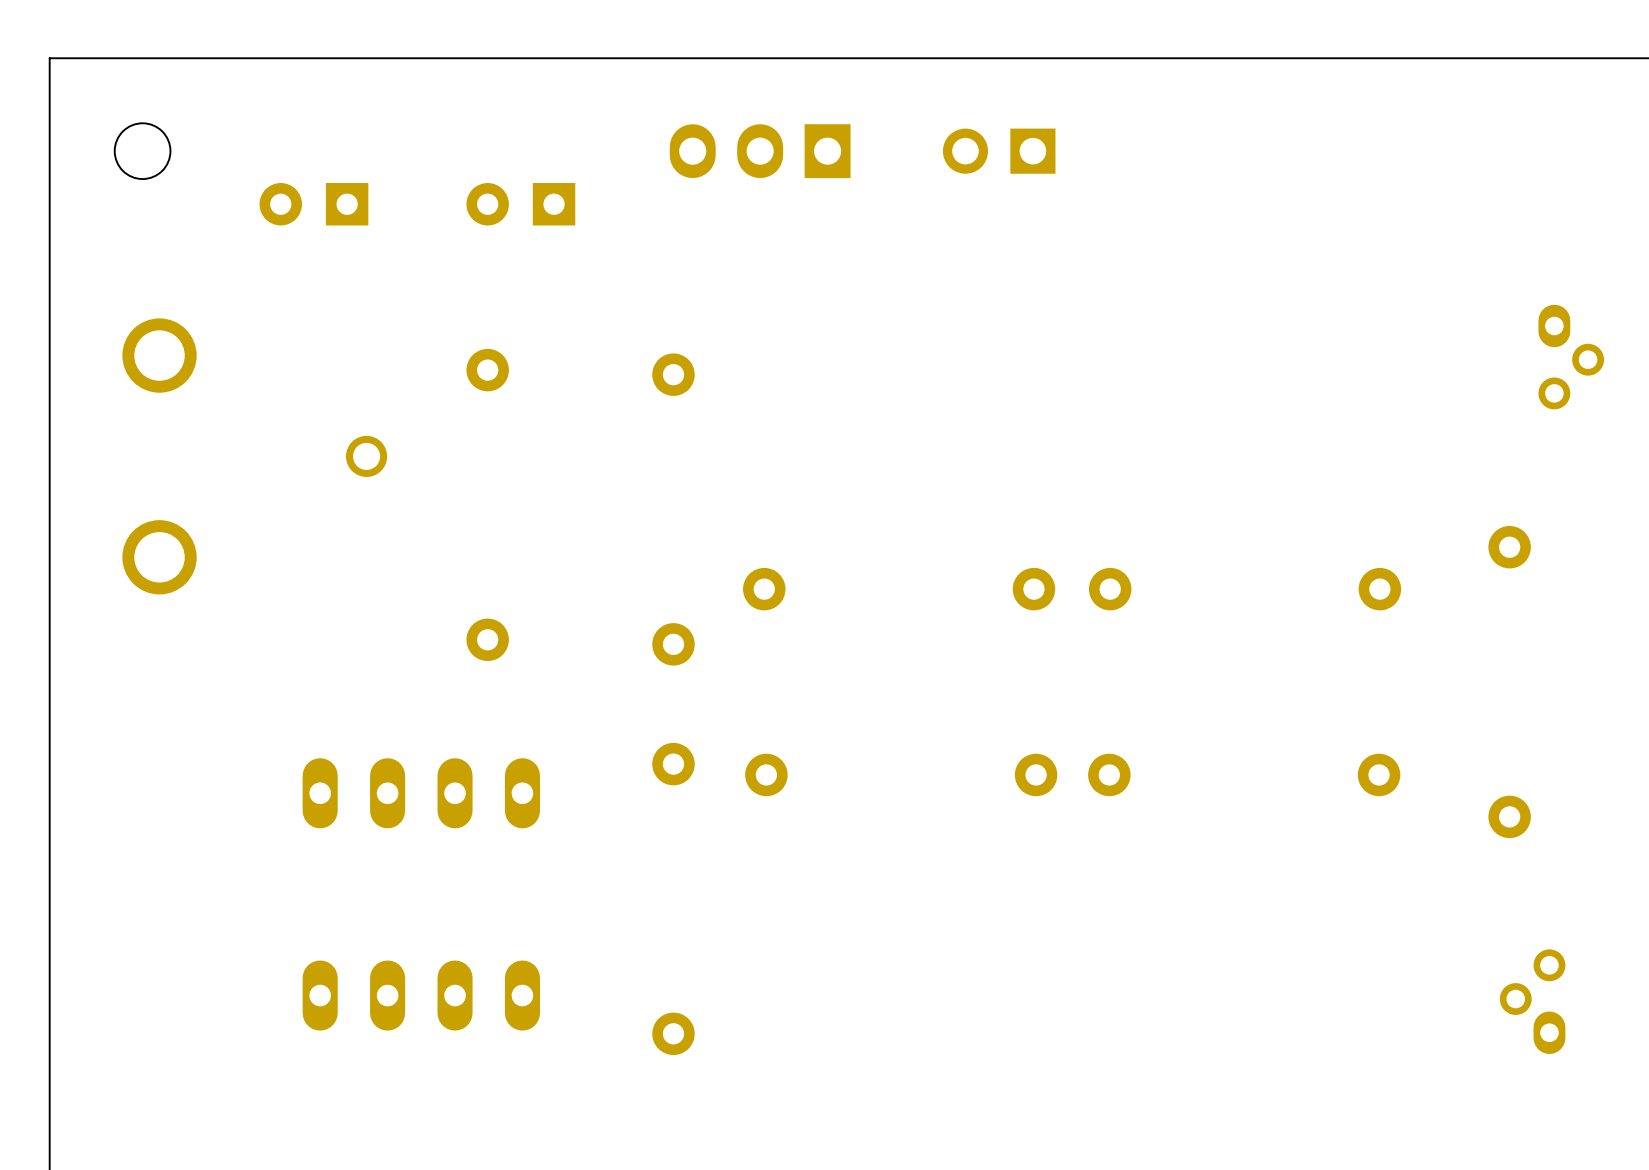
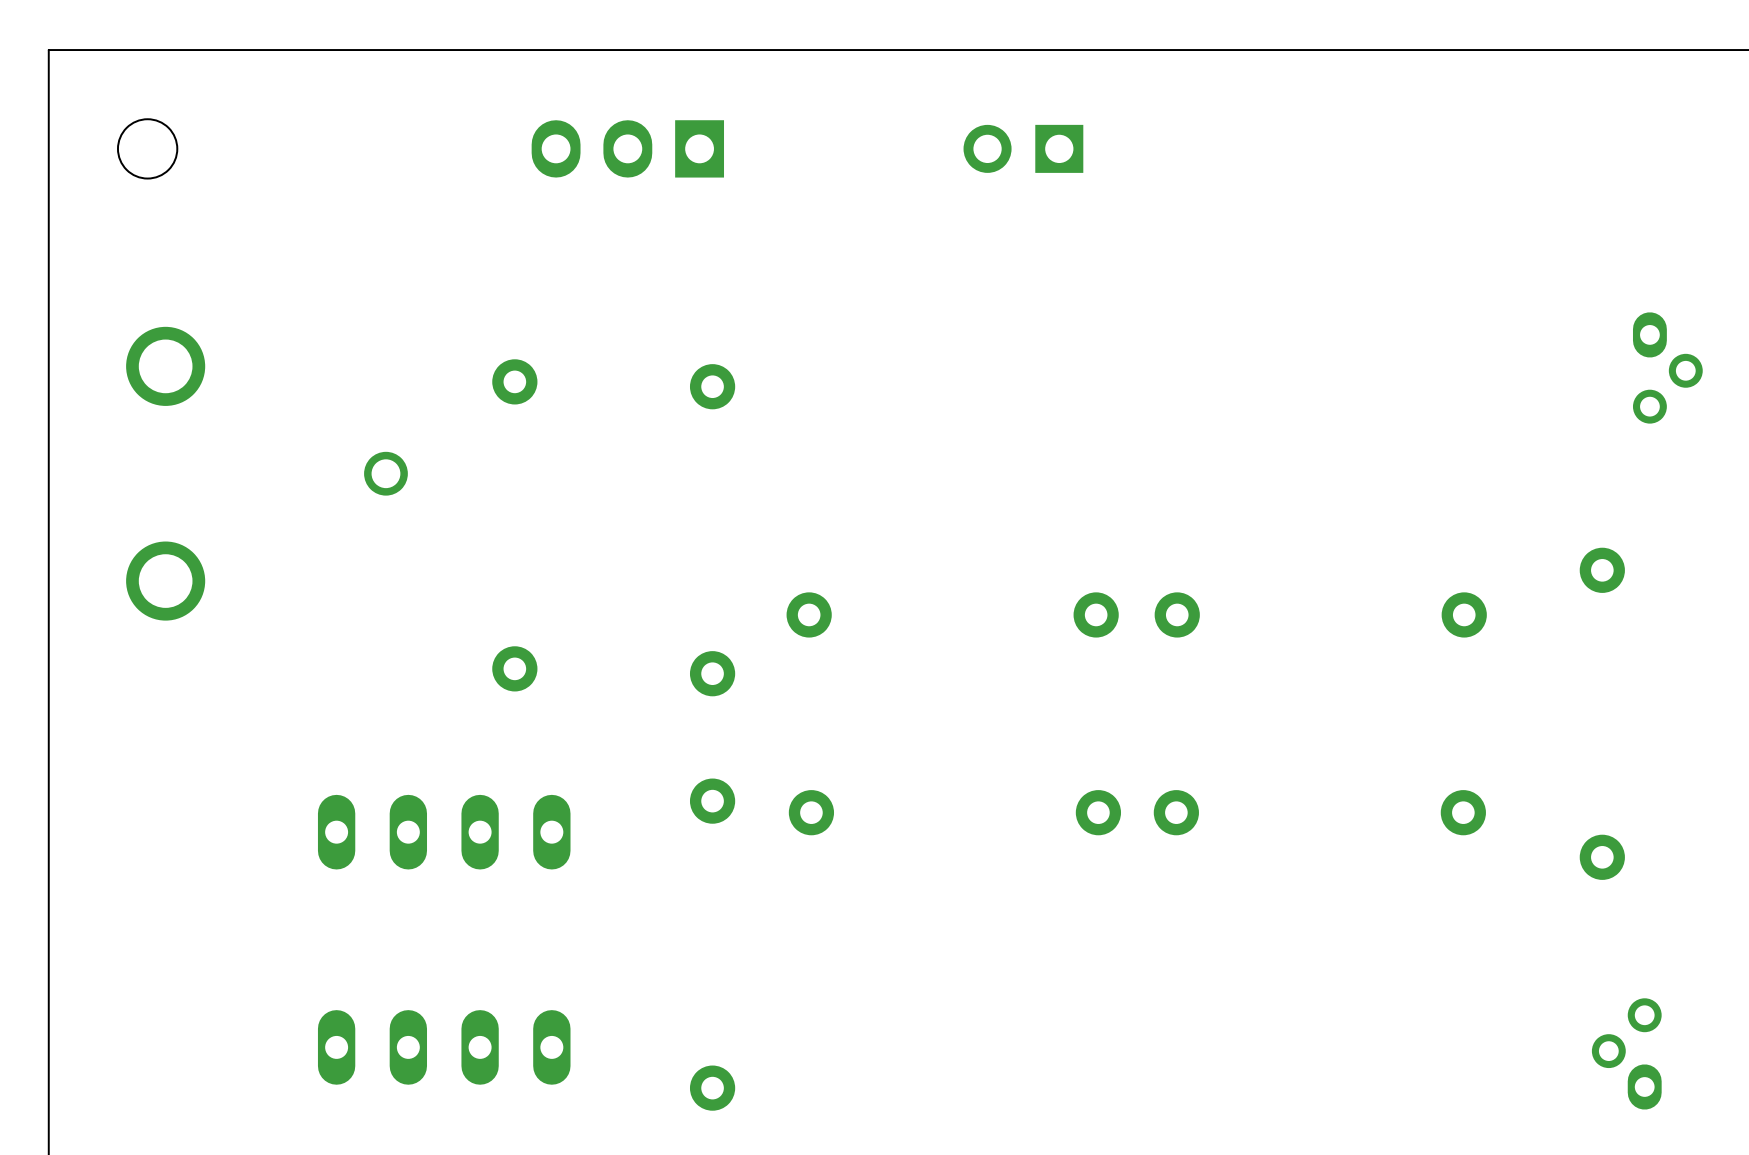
part position: (760, 151) -> (627, 148)
part position: (999, 151) -> (1023, 148)
part: (313, 204) -> none
part: (520, 204) -> none

